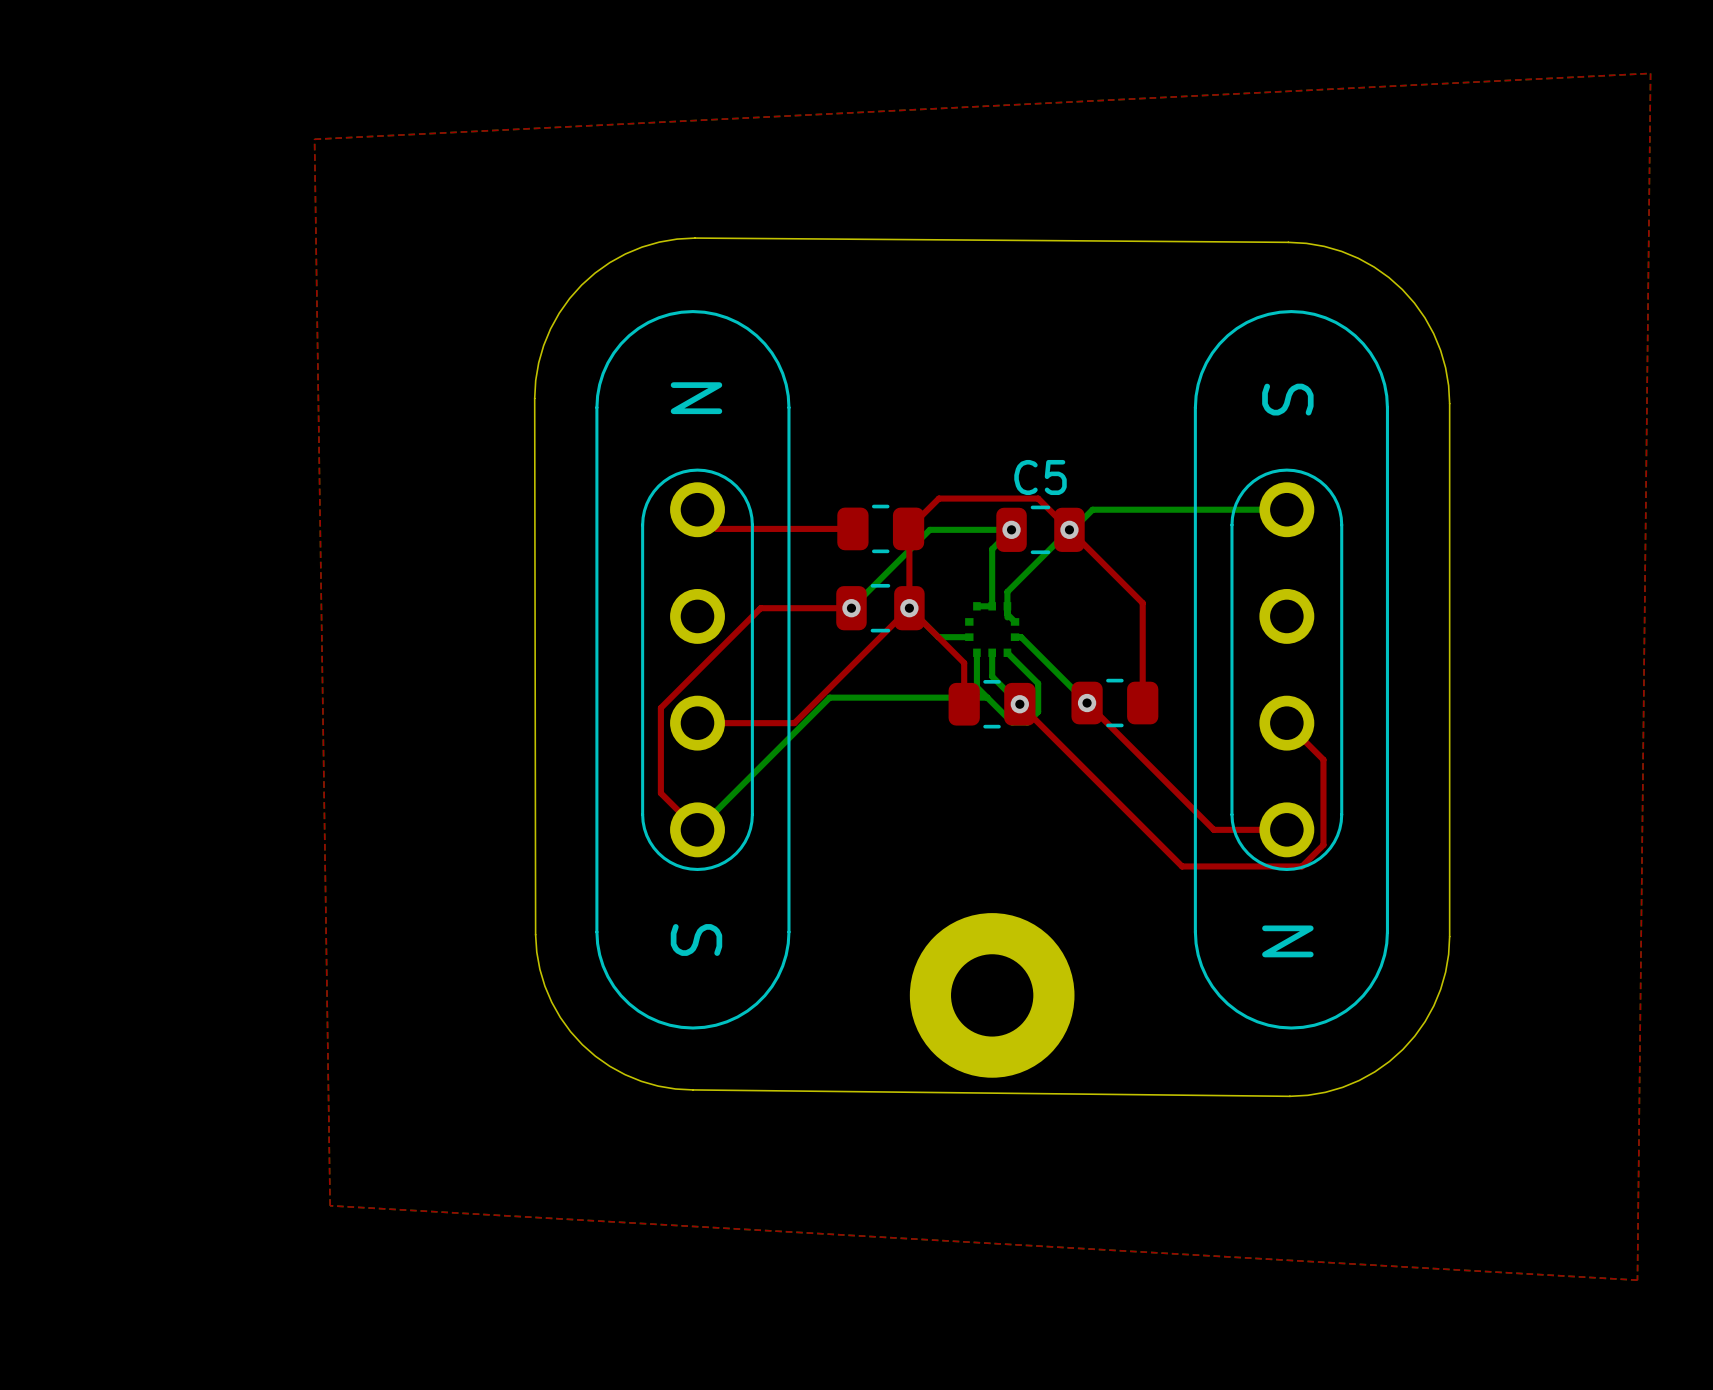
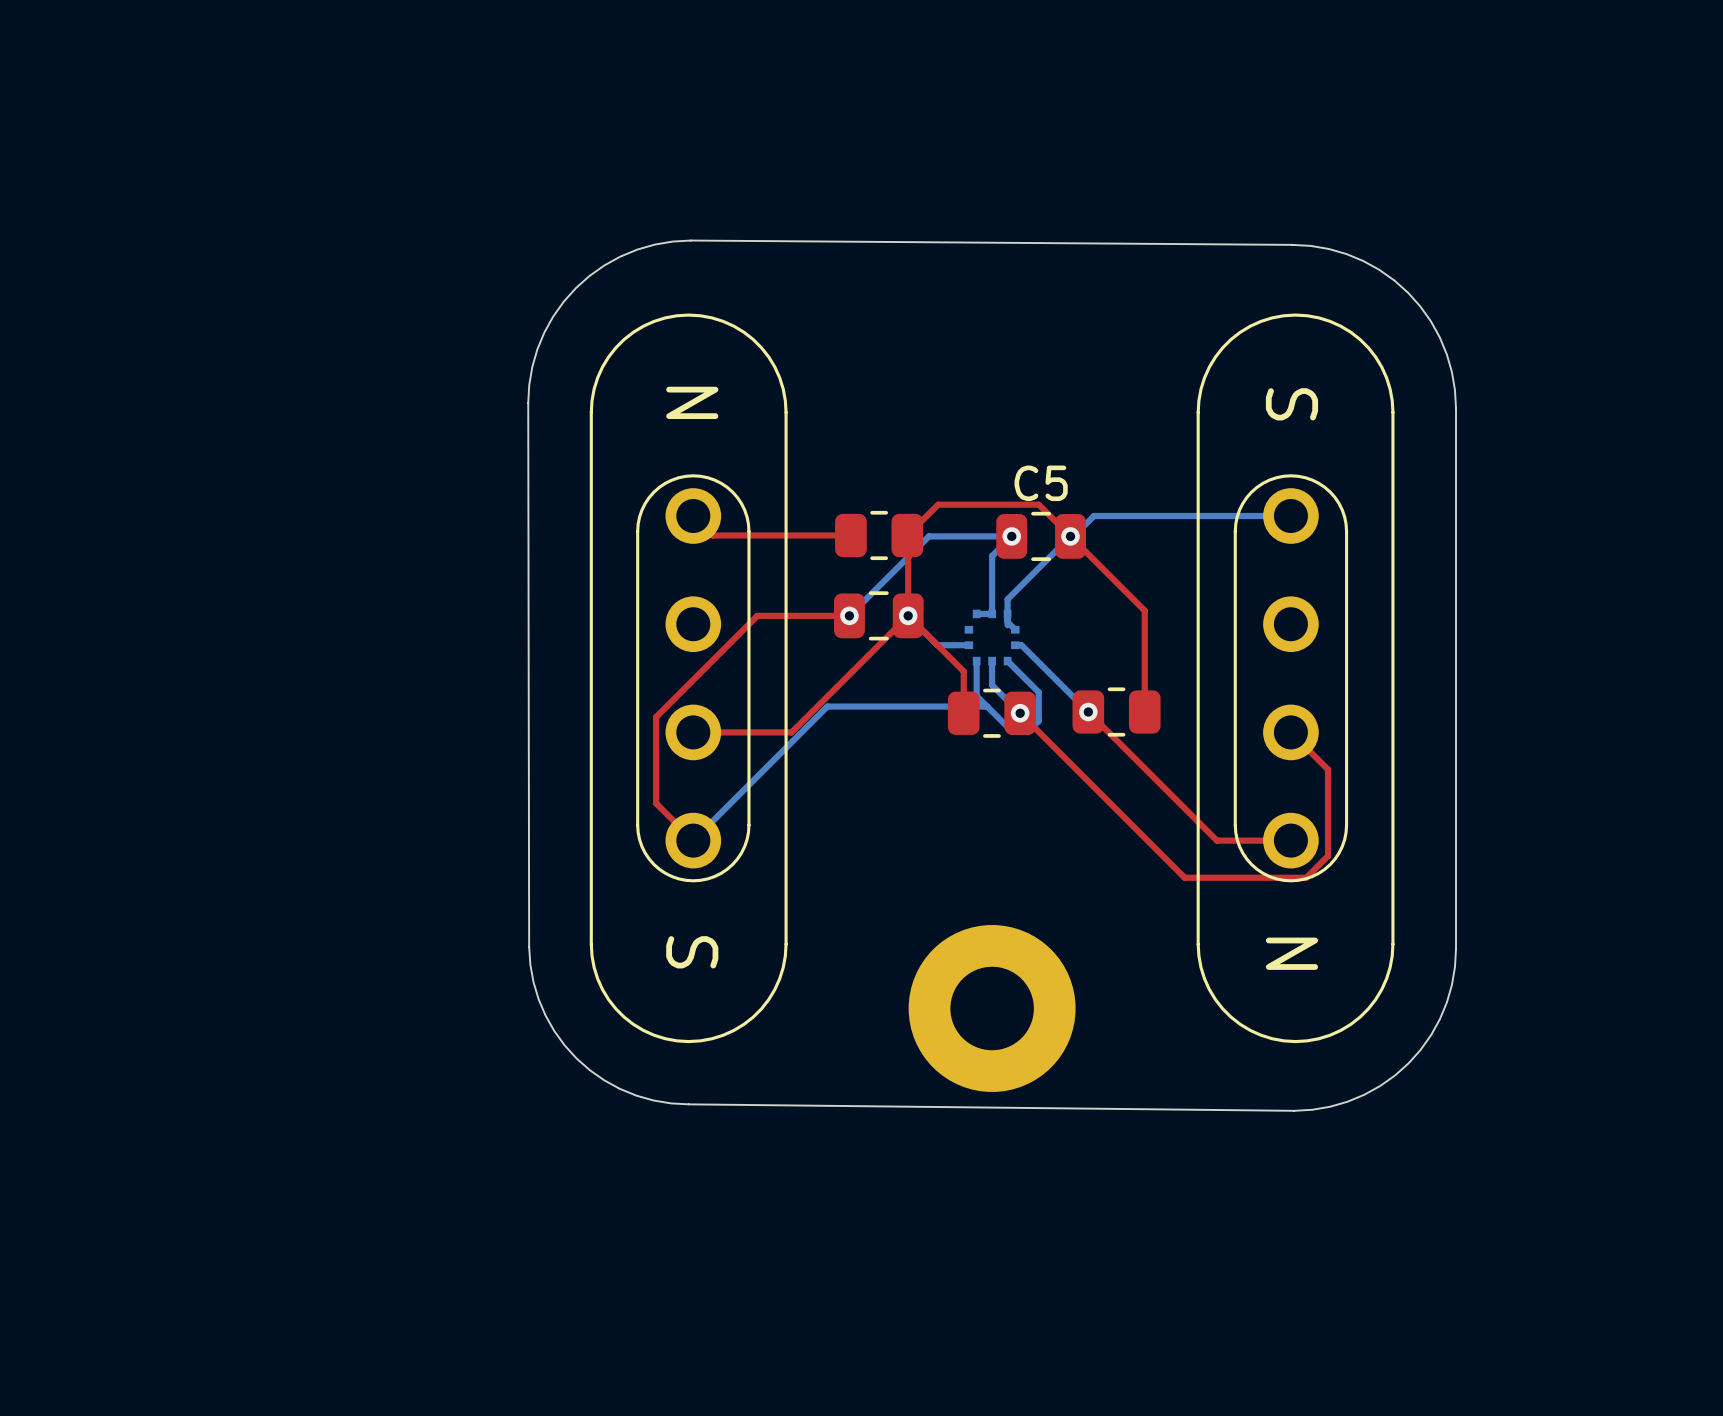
top zone outline: (1650, 73) (314, 139) (330, 1205) (1637, 1280) (1650, 73) -> none

